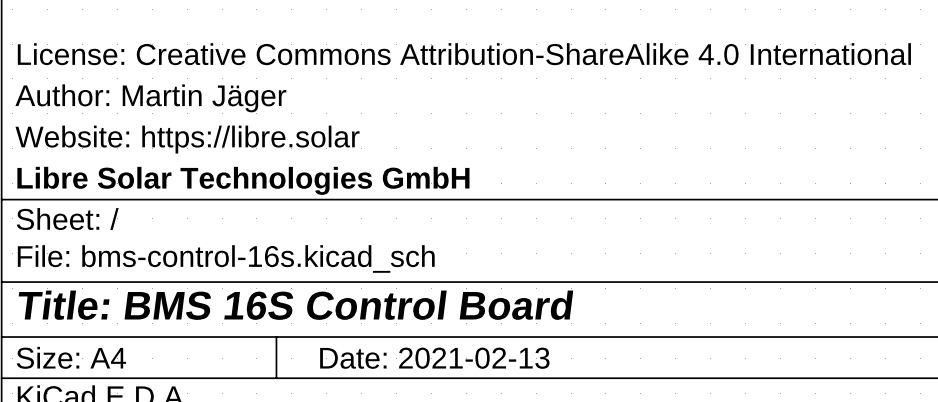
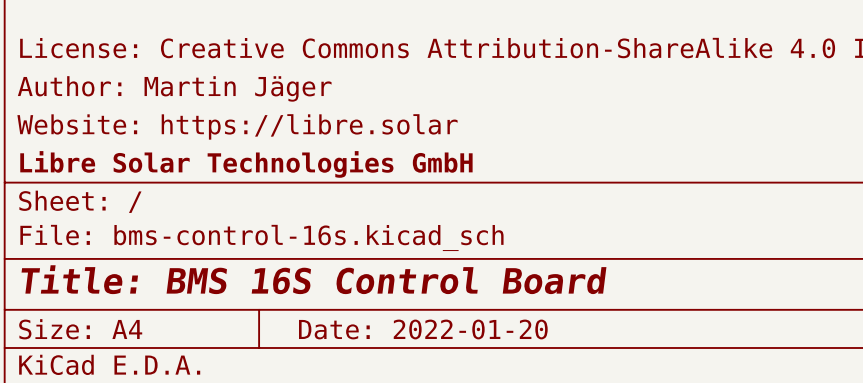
title block: Date: 2021-02-13 (434, 358) -> Date: 2022-01-20 (423, 329)

